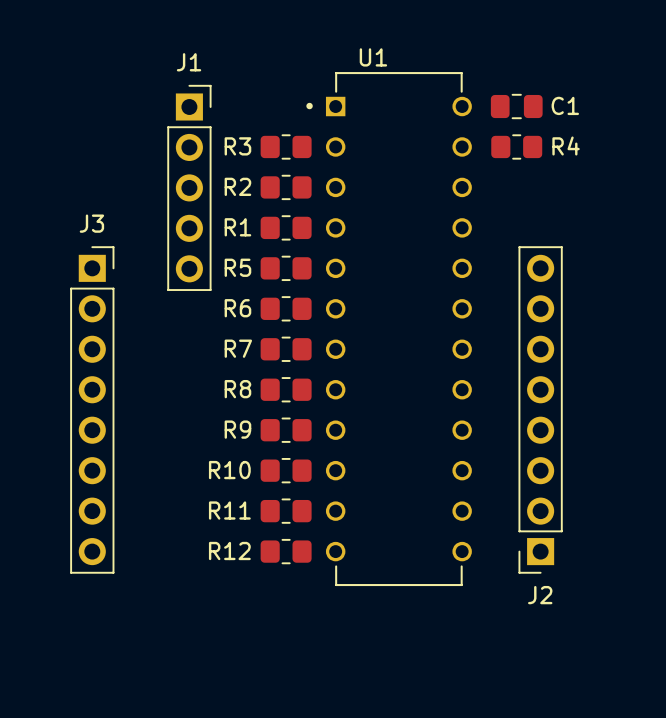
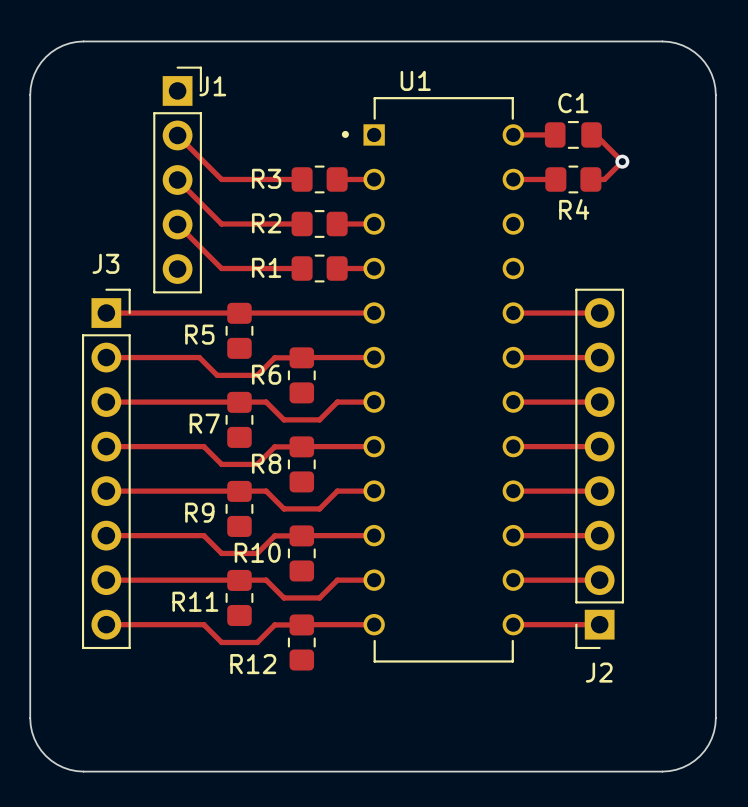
board edge: none -> (83, 41) (662, 41) (682, 45) (694, 52) (704, 62) (711, 74) (715, 94) (715, 718) (711, 738) (704, 750) (694, 760) (682, 767) (662, 771) (83, 771) (69, 769) (56, 764) (41, 750) (34, 738) (30, 718) (30, 94) (34, 74) (45, 57) (63, 45) (83, 41)
C1 name position: C1 (565, 105) -> C1 (573, 103)
top track: none -> (177, 135) (221, 179) (302, 179)
top track: none -> (513, 134) (555, 134)
top track: none -> (591, 134) (595, 134) (622, 161) (604, 179) (590, 179)
via: none -> (622, 161)
top track: none -> (337, 179) (374, 179)
top track: none -> (513, 179) (555, 179)
R4 name position: R4 (566, 146) -> R4 (574, 209)
top track: none -> (177, 180) (221, 223) (302, 223)
top track: none -> (177, 224) (221, 268) (302, 268)
J1 position: (189, 187) -> (177, 180)
top track: none -> (337, 223) (374, 223)
top track: none -> (337, 268) (374, 268)
top track: none -> (106, 313) (374, 313)
R5 rotation: 0° (286, 268) -> 90° clockwise (239, 330)
R5 position: (286, 268) -> (239, 330)
top track: none -> (513, 313) (599, 313)
top track: none -> (106, 357) (199, 357) (217, 375) (257, 375) (274, 357) (374, 357)
R6 rotation: 0° (286, 308) -> 90° clockwise (301, 375)
top track: none -> (513, 357) (599, 357)
top track: none -> (106, 402) (266, 402) (284, 419) (319, 419) (337, 402) (374, 402)
R7 rotation: 0° (286, 349) -> 90° clockwise (239, 419)
R7 position: (286, 349) -> (239, 419)
top track: none -> (513, 402) (599, 402)
top track: none -> (106, 446) (203, 446) (221, 464) (257, 464) (274, 446) (374, 446)
R8 rotation: 0° (286, 389) -> 90° clockwise (301, 464)
top track: none -> (513, 446) (599, 446)
top track: none -> (106, 491) (266, 491) (284, 508) (319, 508) (337, 491) (374, 491)
R9 rotation: 0° (286, 430) -> 90° clockwise (239, 508)
R9 position: (286, 430) -> (239, 508)
top track: none -> (513, 491) (599, 491)
top track: none -> (106, 535) (203, 535) (221, 553) (257, 553) (274, 535) (374, 535)
R10 rotation: 0° (286, 470) -> 90° clockwise (301, 553)
top track: none -> (513, 535) (599, 535)
top track: none -> (106, 580) (266, 580) (284, 597) (319, 597) (337, 580) (374, 580)
R11 rotation: 0° (286, 511) -> 90° clockwise (239, 597)
R11 position: (286, 511) -> (239, 597)
top track: none -> (513, 580) (599, 580)
top track: none -> (106, 624) (203, 624) (221, 642) (257, 642) (274, 624) (374, 624)
R12 rotation: 0° (286, 551) -> 90° clockwise (301, 642)
top track: none -> (513, 624) (599, 624)

